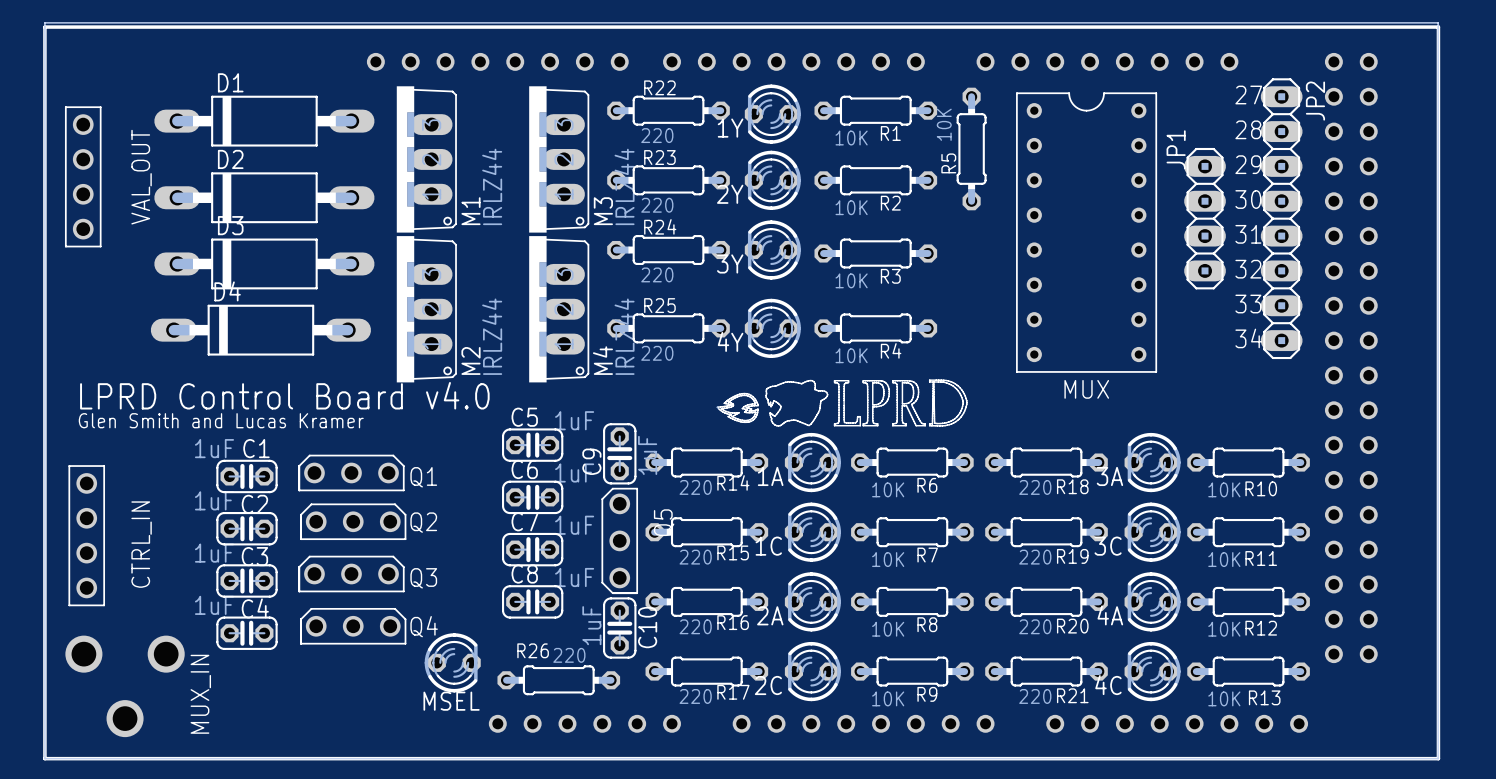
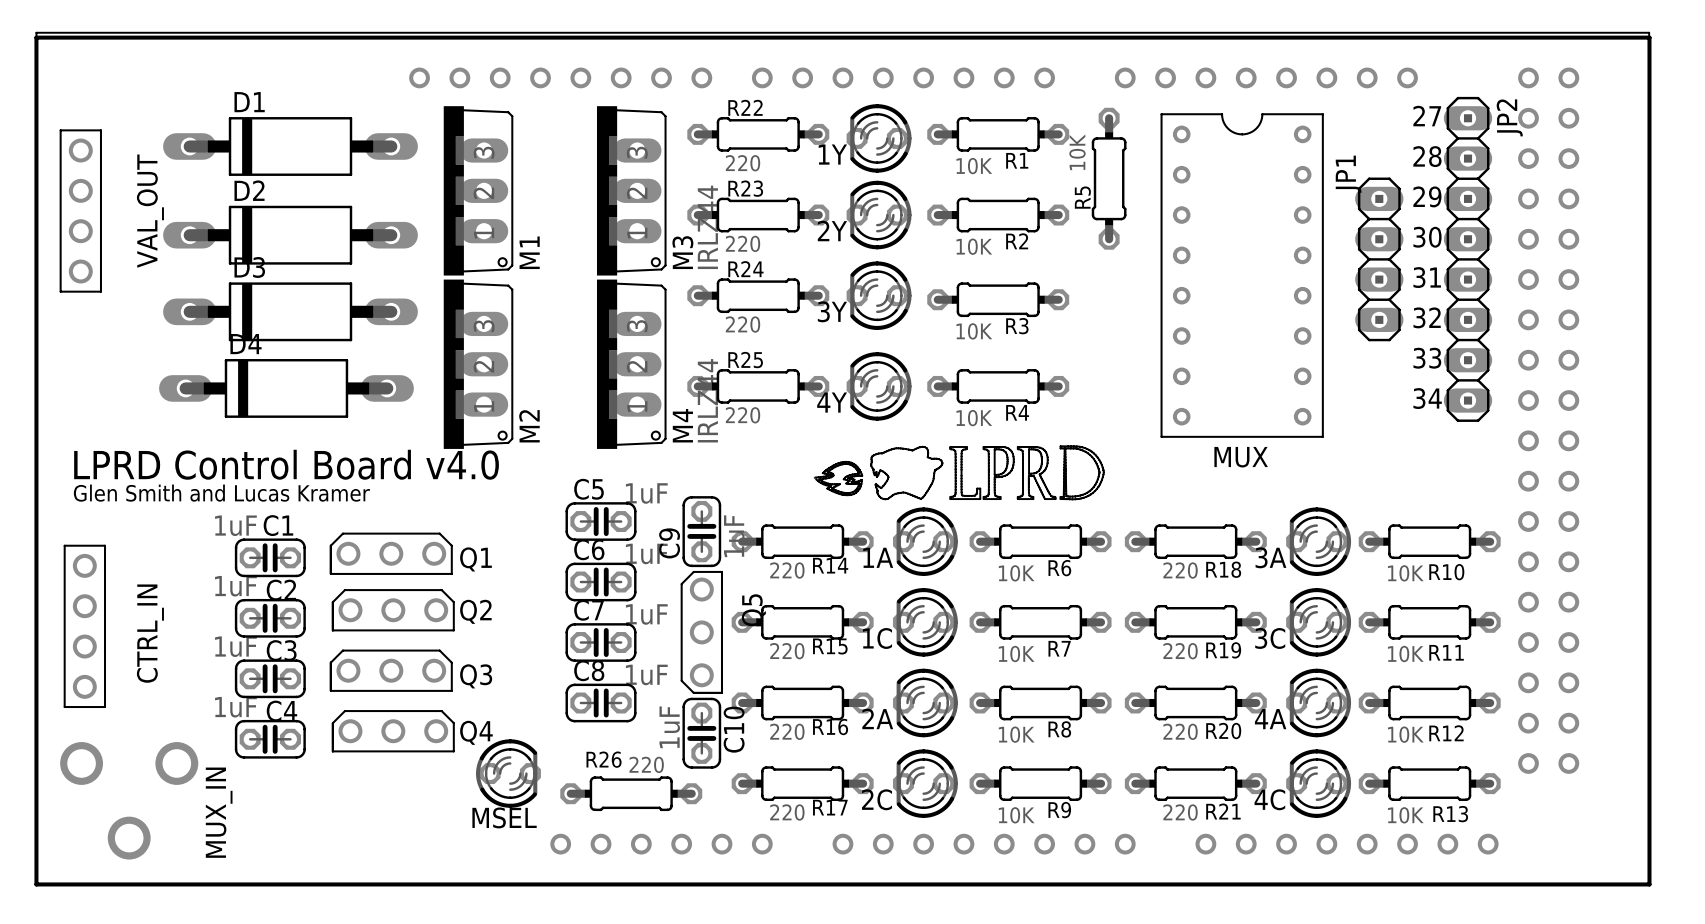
M1 value: IRLZ44 (492, 186) -> none
M2 value: IRLZ44 (492, 336) -> none

